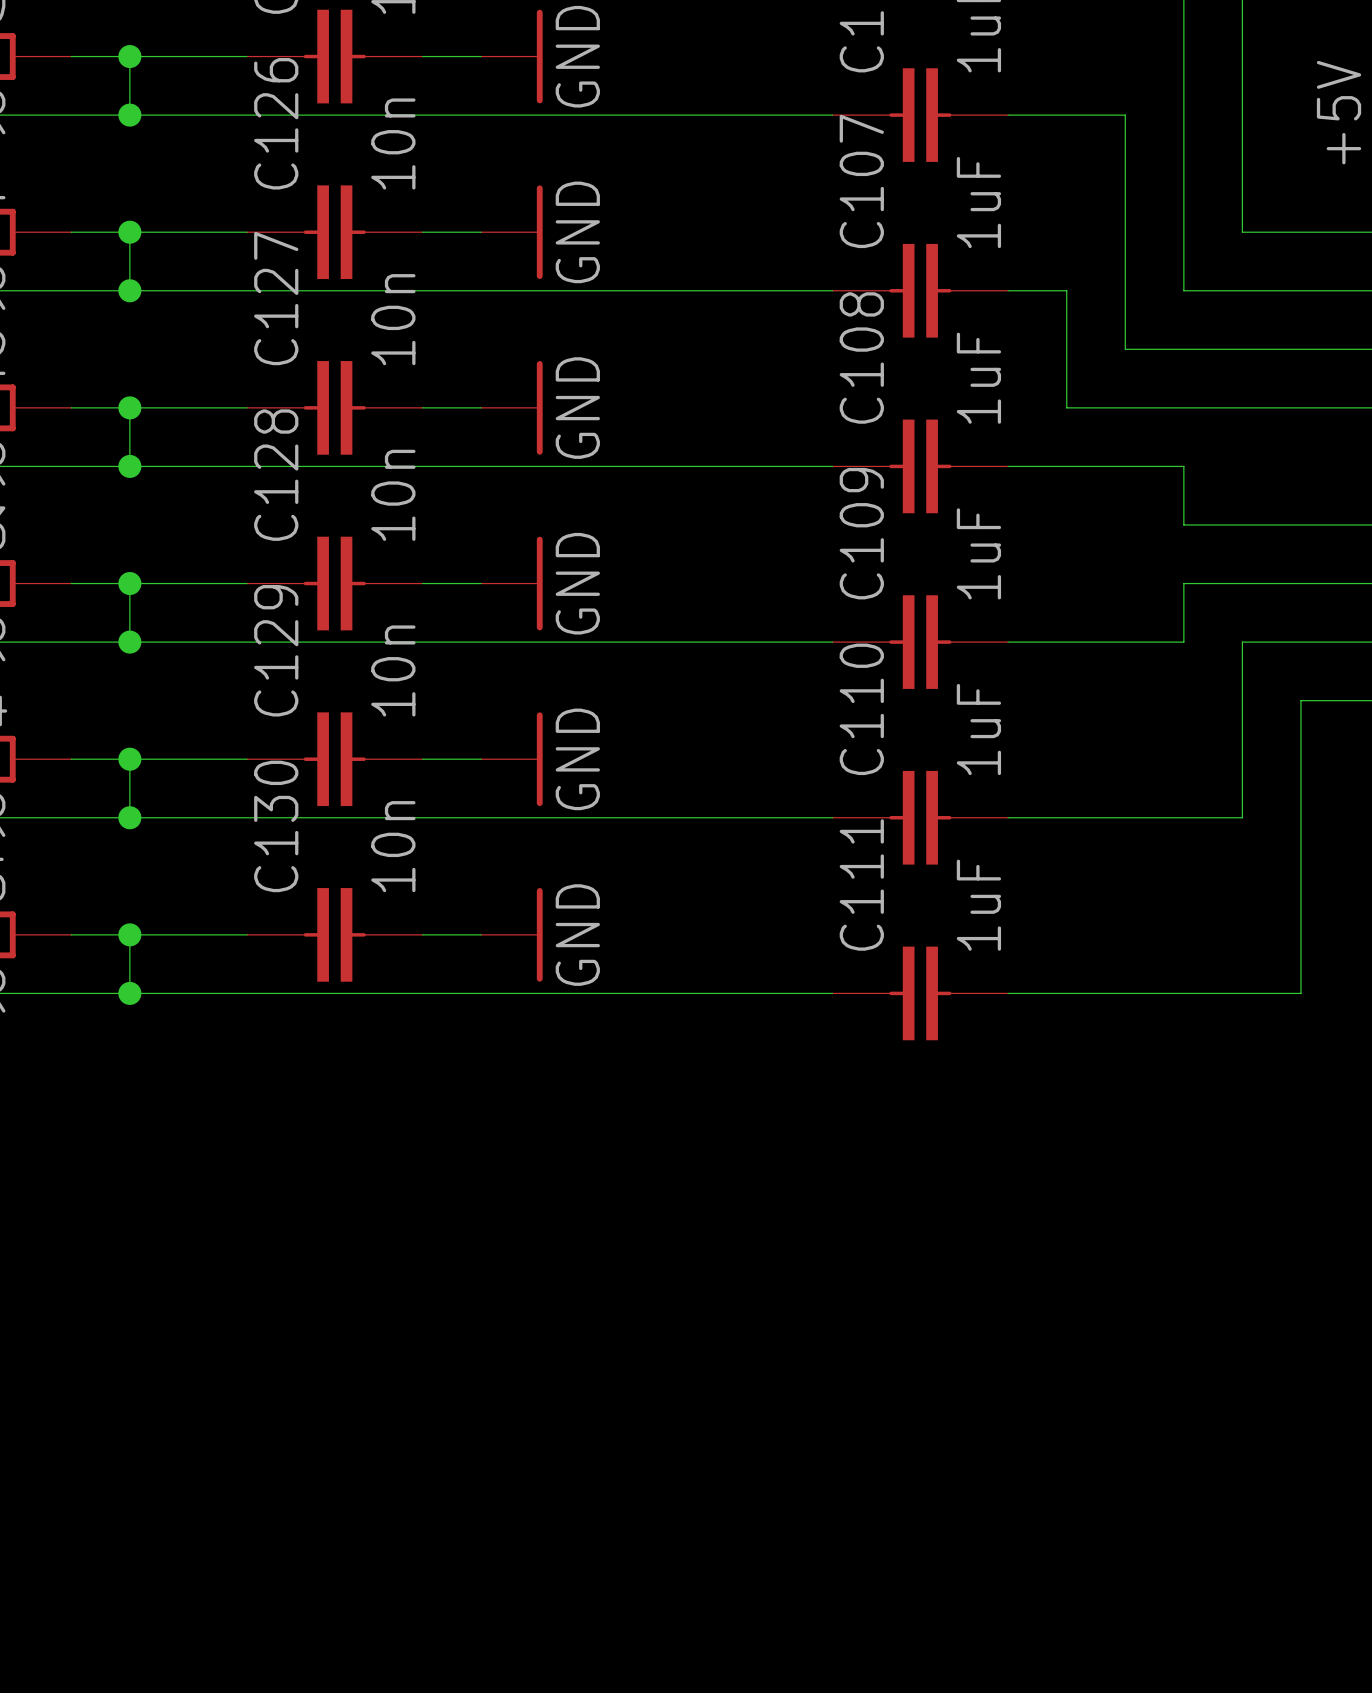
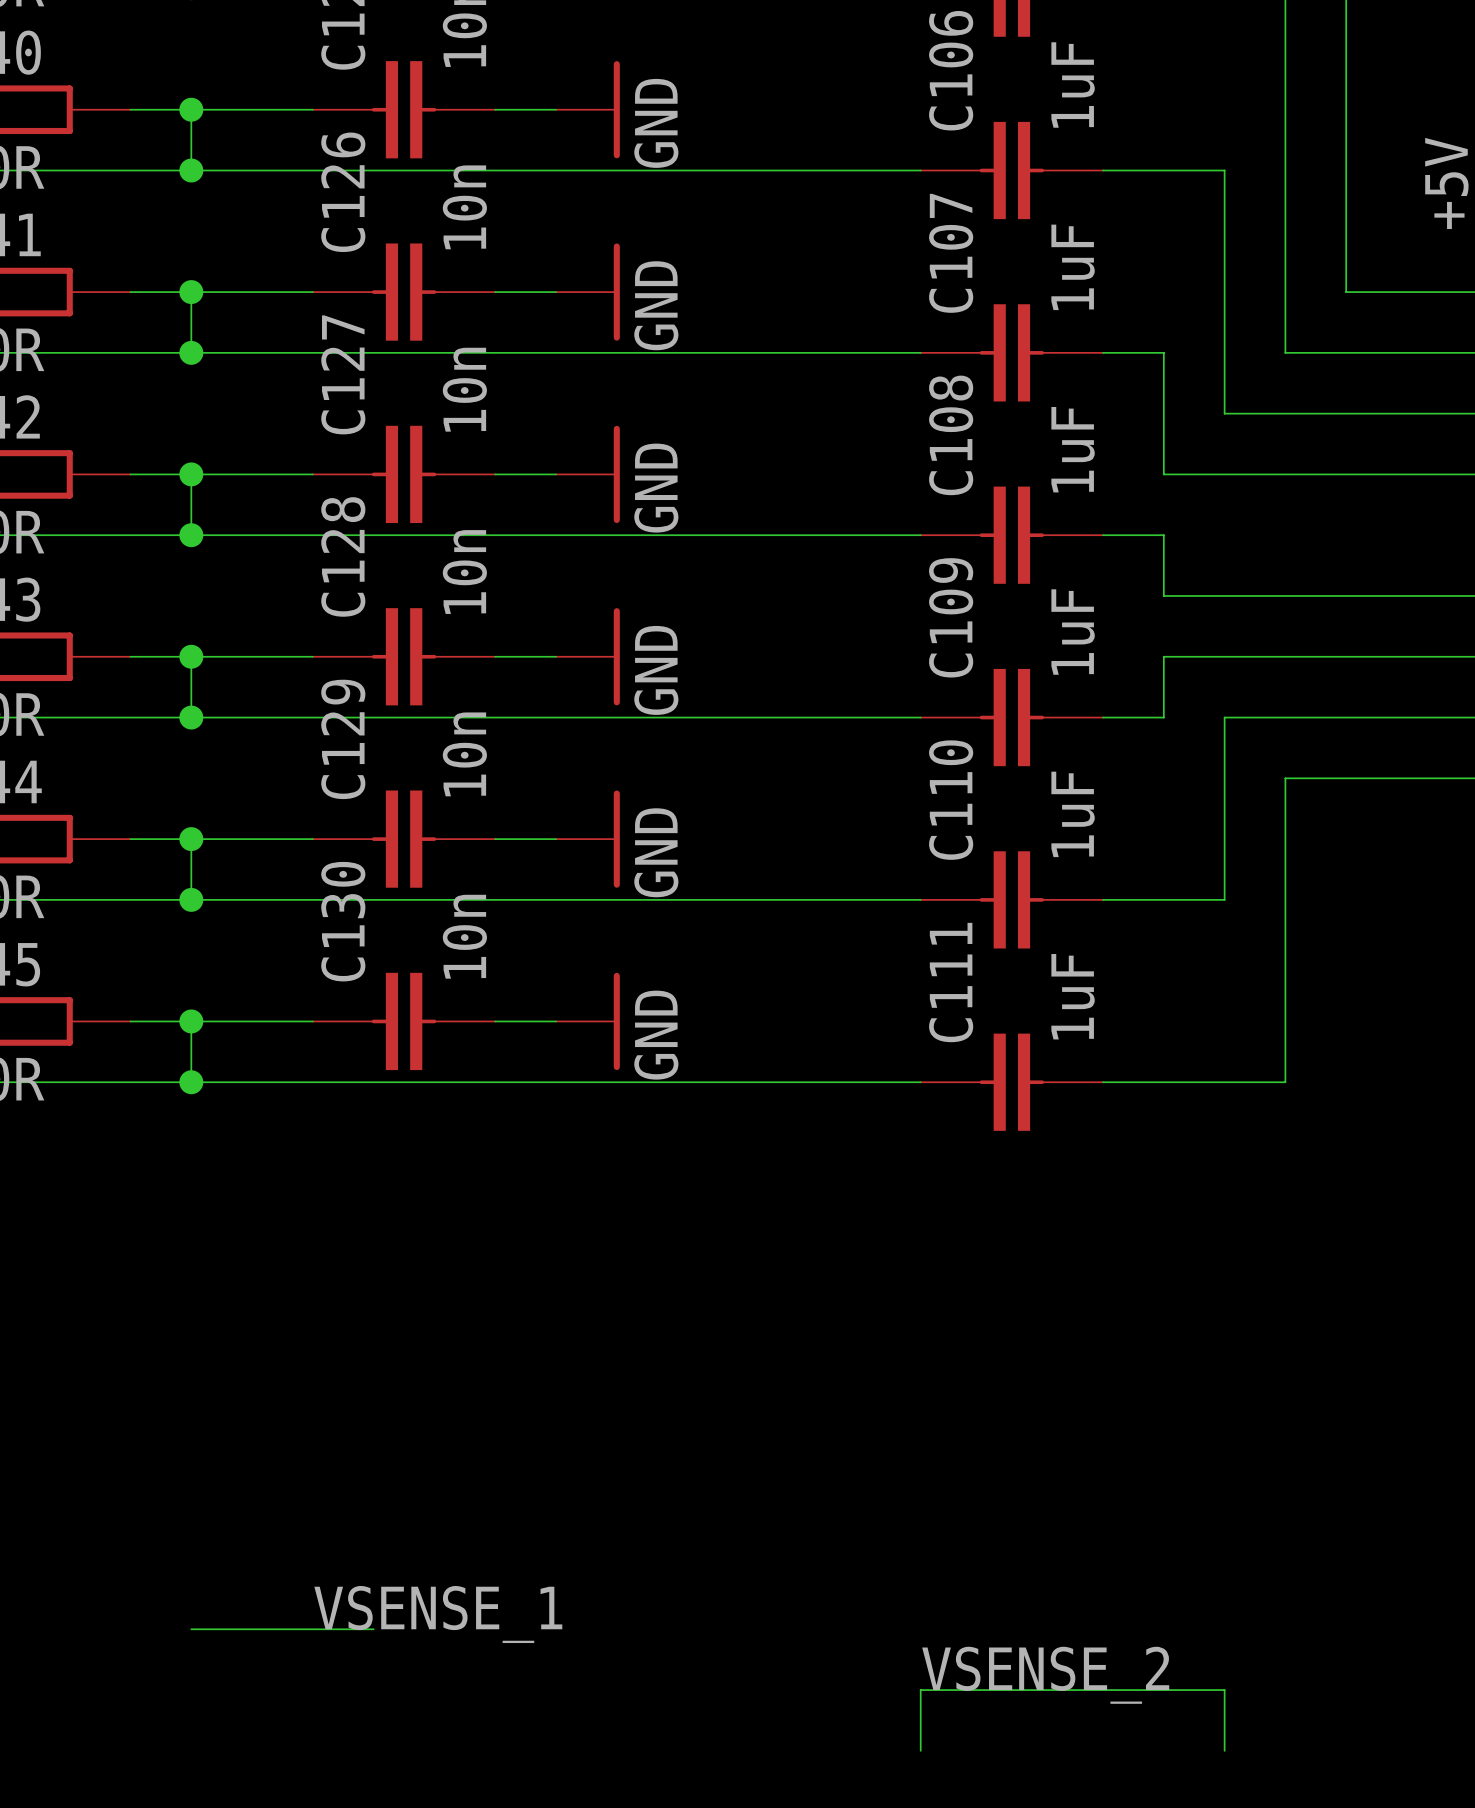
wire: (1066, 466) (1183, 466) (1183, 524) -> (1163, 535) (1163, 595) (1285, 595)
wire: (1183, 583) (1183, 642) -> (1346, 717) (1285, 717)
wire: (1066, 642) (1125, 642) -> (1163, 717) (1163, 656) (1285, 656)
wire: (1242, 642) (1242, 817) (1125, 817) -> (1224, 717) (1224, 899)
wire: (1300, 700) (1300, 993) (1183, 993) -> (1406, 778) (1285, 778) (1285, 1082)
label: none -> VSENSE_1 (438, 1614)
wire: none -> (191, 1629) (373, 1629)
label: none -> VSENSE_2 (1045, 1675)
wire: none -> (920, 1750) (920, 1690) (1224, 1690) (1224, 1750)

